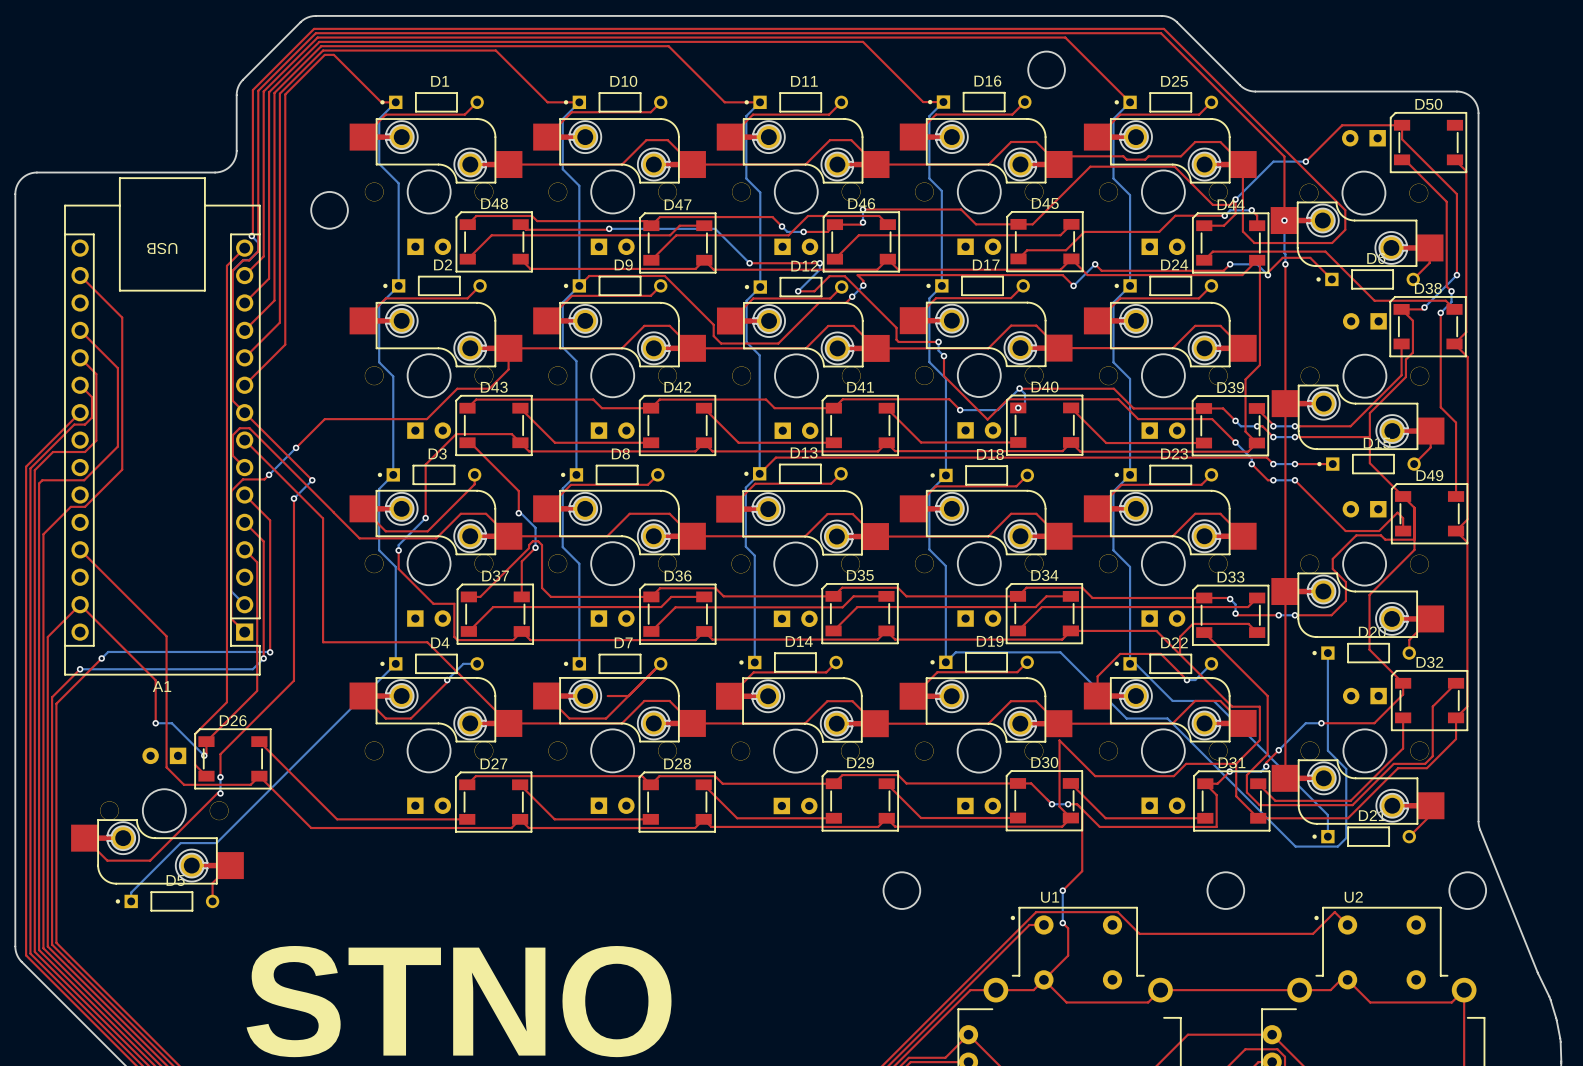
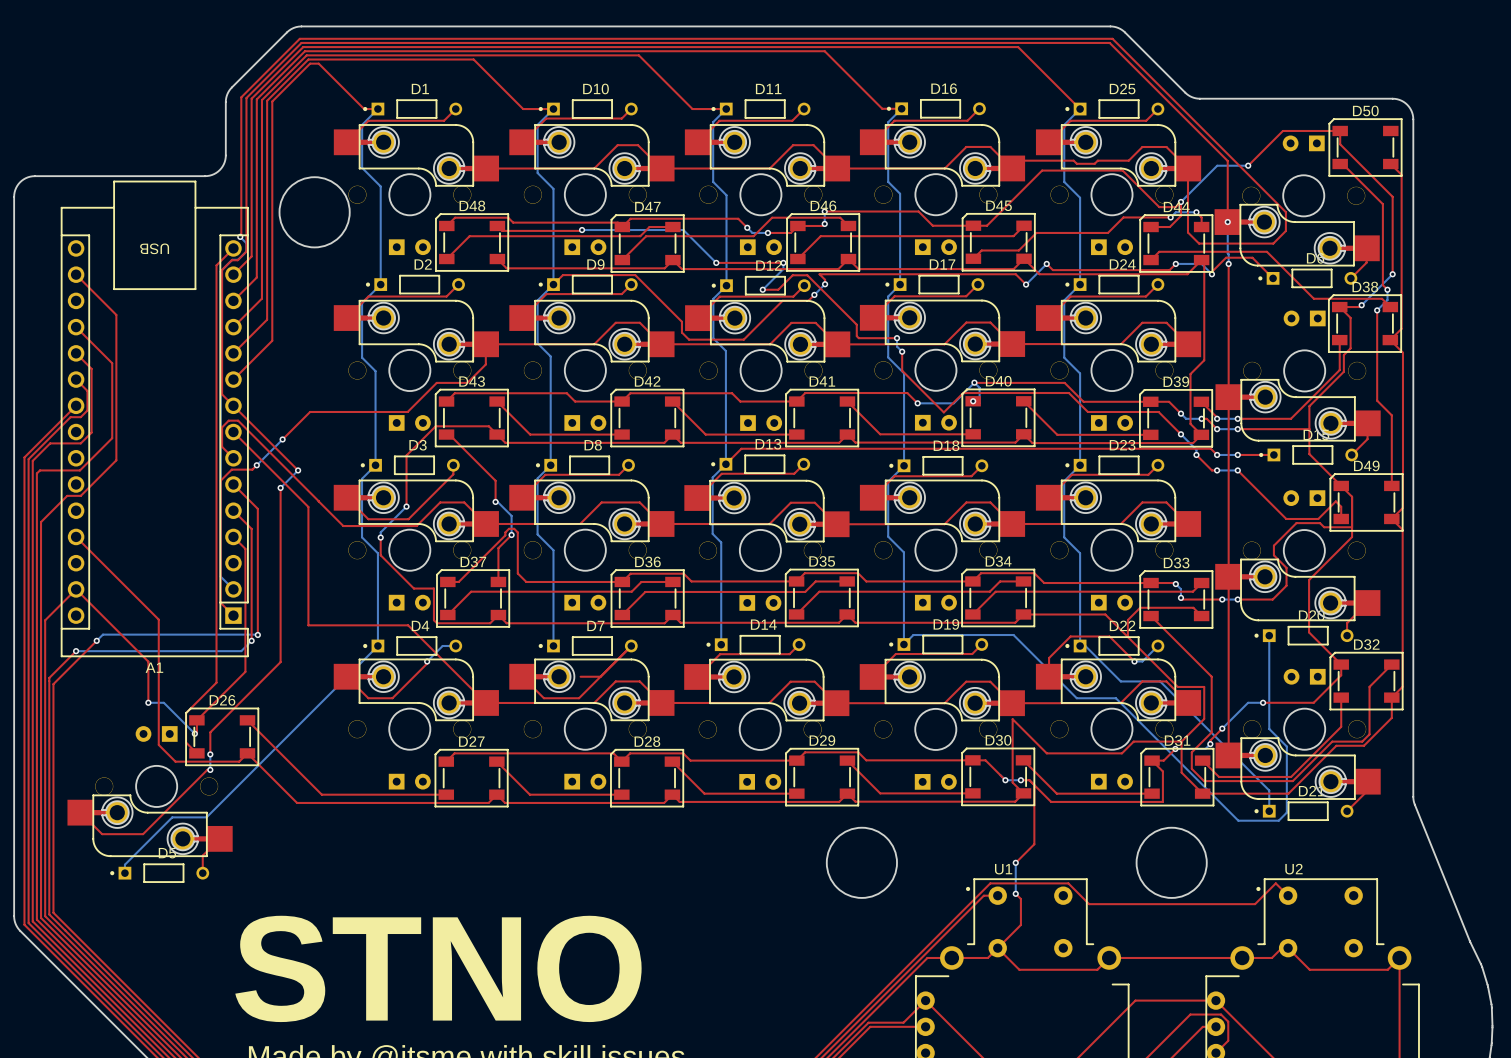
round board edge: [1027, 51, 1066, 89] -> none
round board edge size: [310, 191, 349, 229] -> [279, 176, 350, 248]
round board edge size: [883, 872, 921, 910] -> [826, 827, 898, 899]
round board edge size: [1207, 872, 1245, 910] -> [1136, 827, 1208, 899]
round board edge: [1449, 872, 1487, 910] -> none

